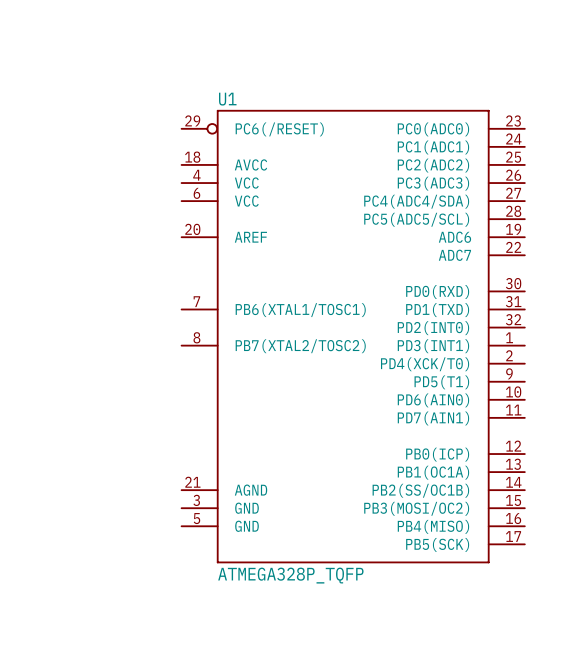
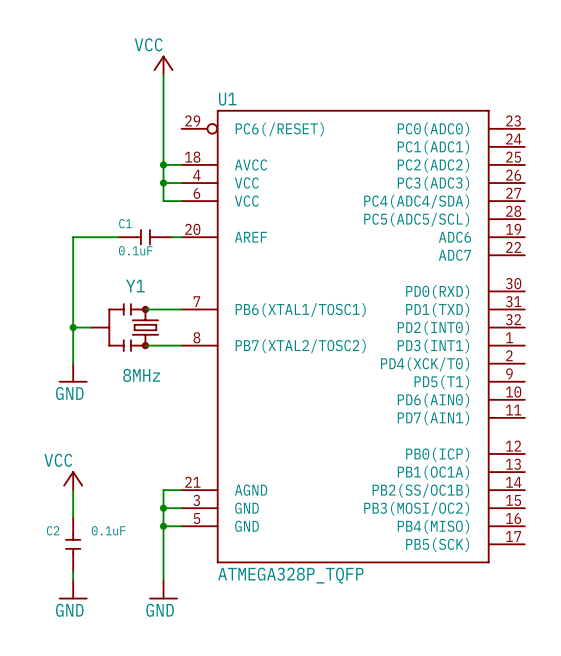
power symbol: none -> VCC (163, 65)
wire: none -> (163, 74) (163, 201) (181, 201)
wire: none -> (163, 164) (181, 164)
junction: none -> (163, 164)
wire: none -> (163, 183) (181, 183)
junction: none -> (163, 183)
wire: none -> (118, 237) (73, 237) (73, 363)
C1: none -> 0.1uF (145, 237)
wire: none -> (172, 237) (181, 237)
wire: none -> (145, 309) (181, 309)
wire: none -> (73, 327) (91, 327)
junction: none -> (73, 327)
Y1: none -> 8MHz (124, 327)
wire: none -> (145, 345) (181, 345)
power symbol: none -> GND (73, 373)
power symbol: none -> VCC (73, 480)
wire: none -> (73, 490) (73, 517)
wire: none -> (181, 490) (163, 490) (163, 580)
wire: none -> (163, 508) (181, 508)
junction: none -> (163, 508)
wire: none -> (163, 526) (181, 526)
junction: none -> (163, 526)
C2: none -> 0.1uF (73, 544)
wire: none -> (73, 571) (73, 580)
power symbol: none -> GND (73, 589)
power symbol: none -> GND (163, 589)

